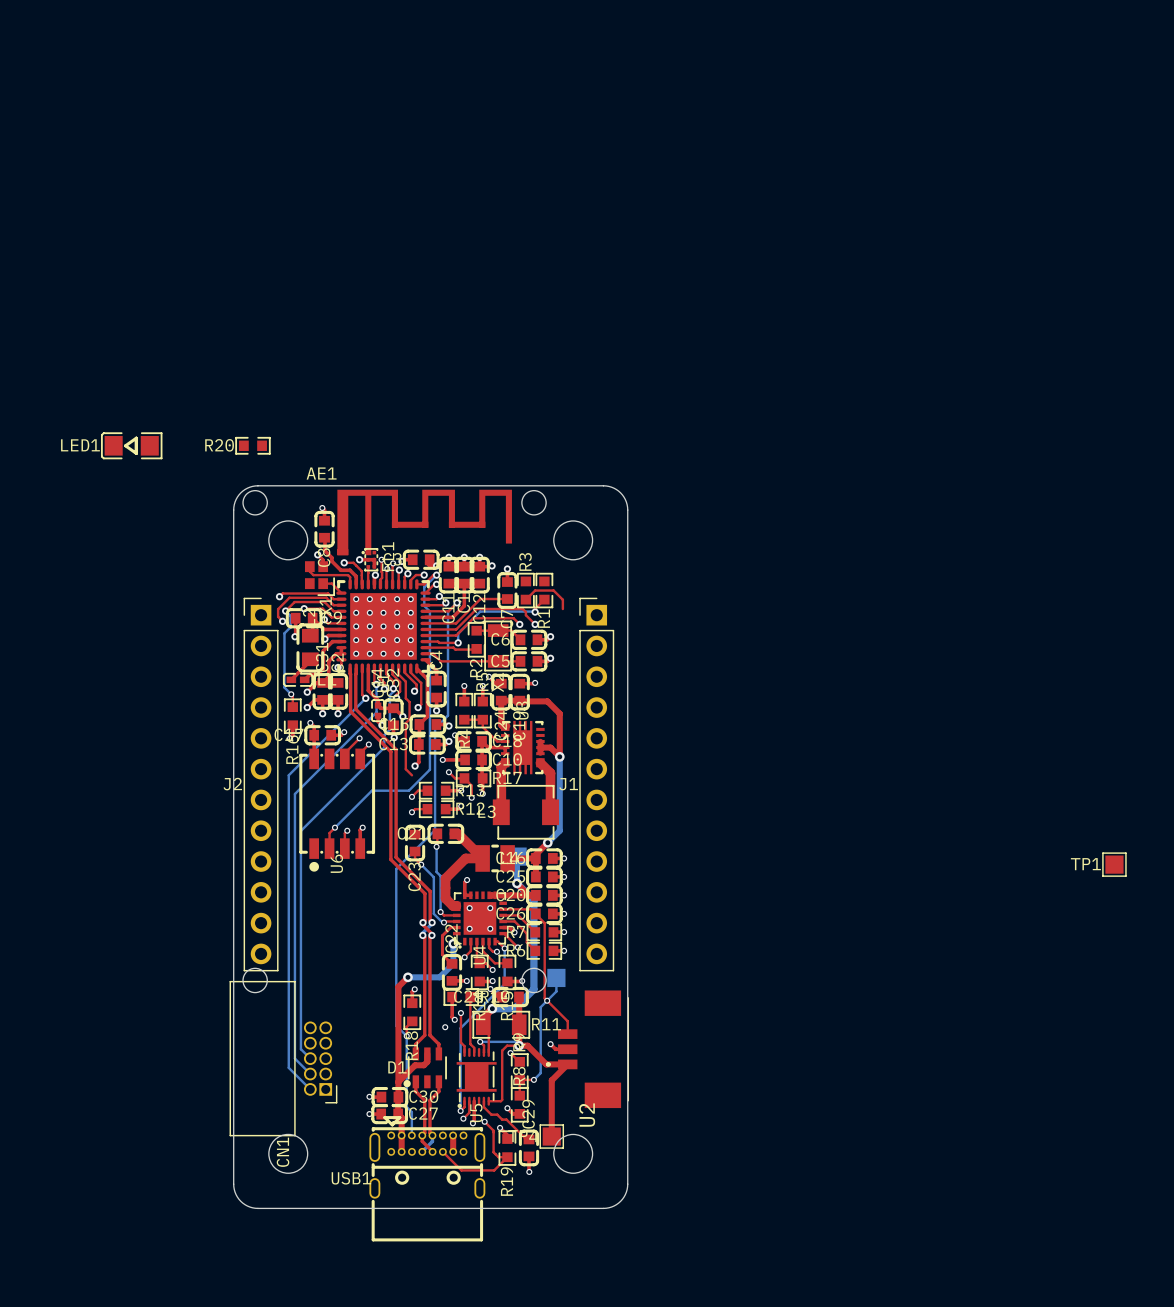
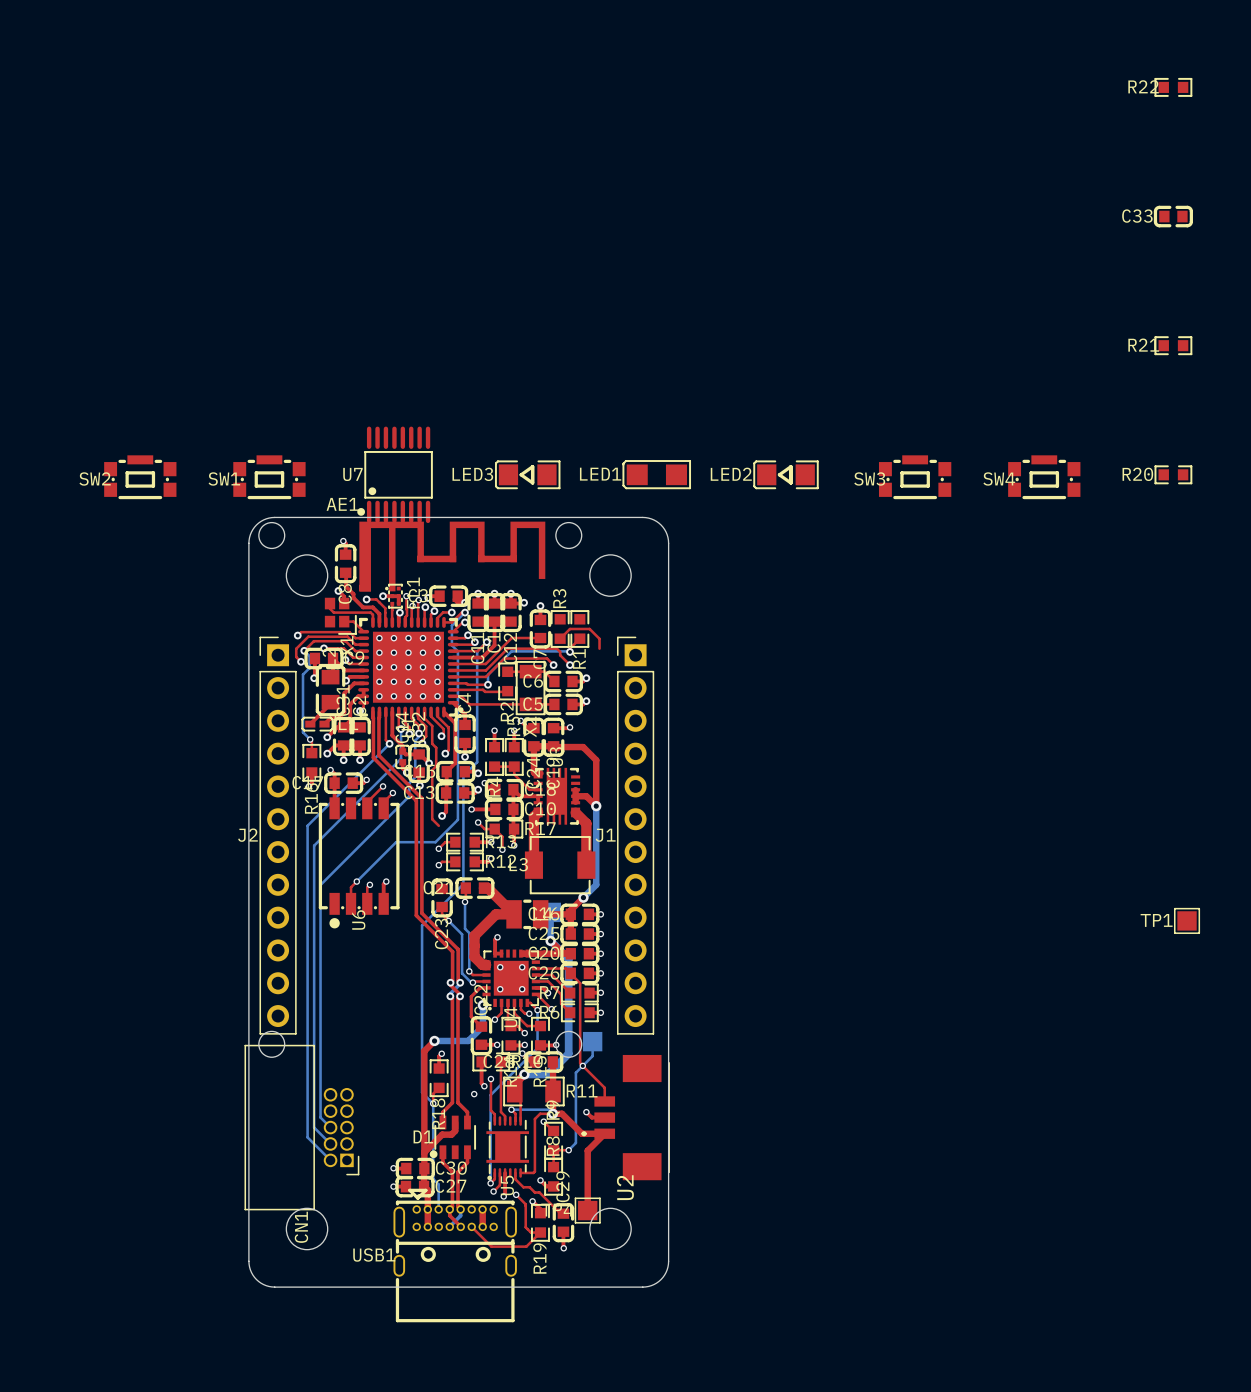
R22: none -> (1173, 87)
C33: none -> (1173, 216)
R21: none -> (1173, 345)
LED1 footprint: [100, 432, 163, 460] -> [622, 460, 692, 490]
R20 position: (252, 445) -> (1173, 474)
U7: none -> (395, 474)
LED3: none -> (527, 474)
LED2: none -> (786, 474)
SW2: none -> (140, 477)
SW1: none -> (269, 477)
SW3: none -> (915, 477)
SW4: none -> (1044, 477)

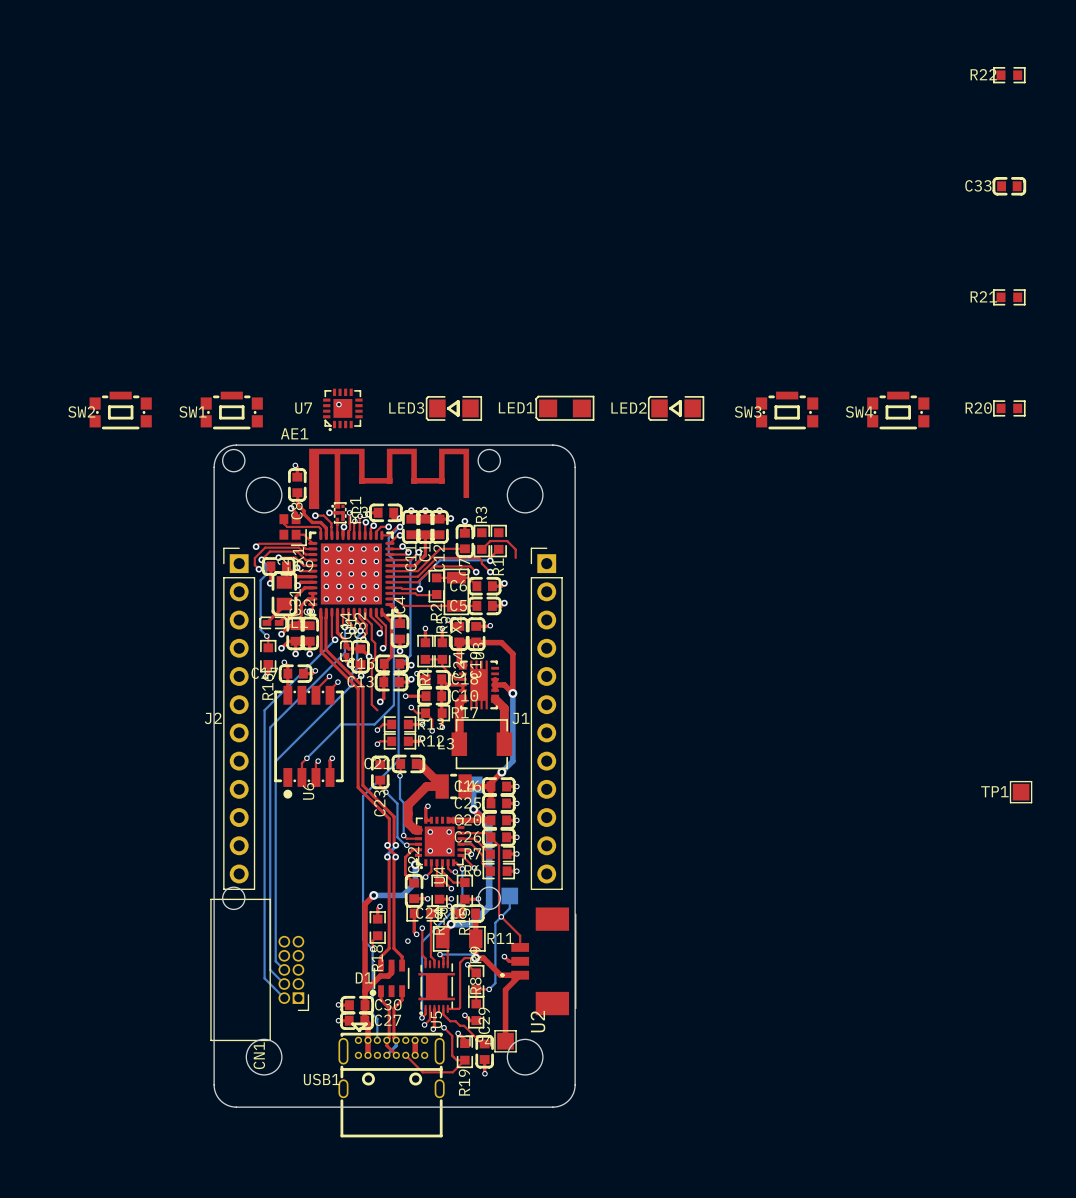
U7 footprint: [357, 426, 433, 524] -> [323, 388, 363, 432]
via: none -> (338, 404)

